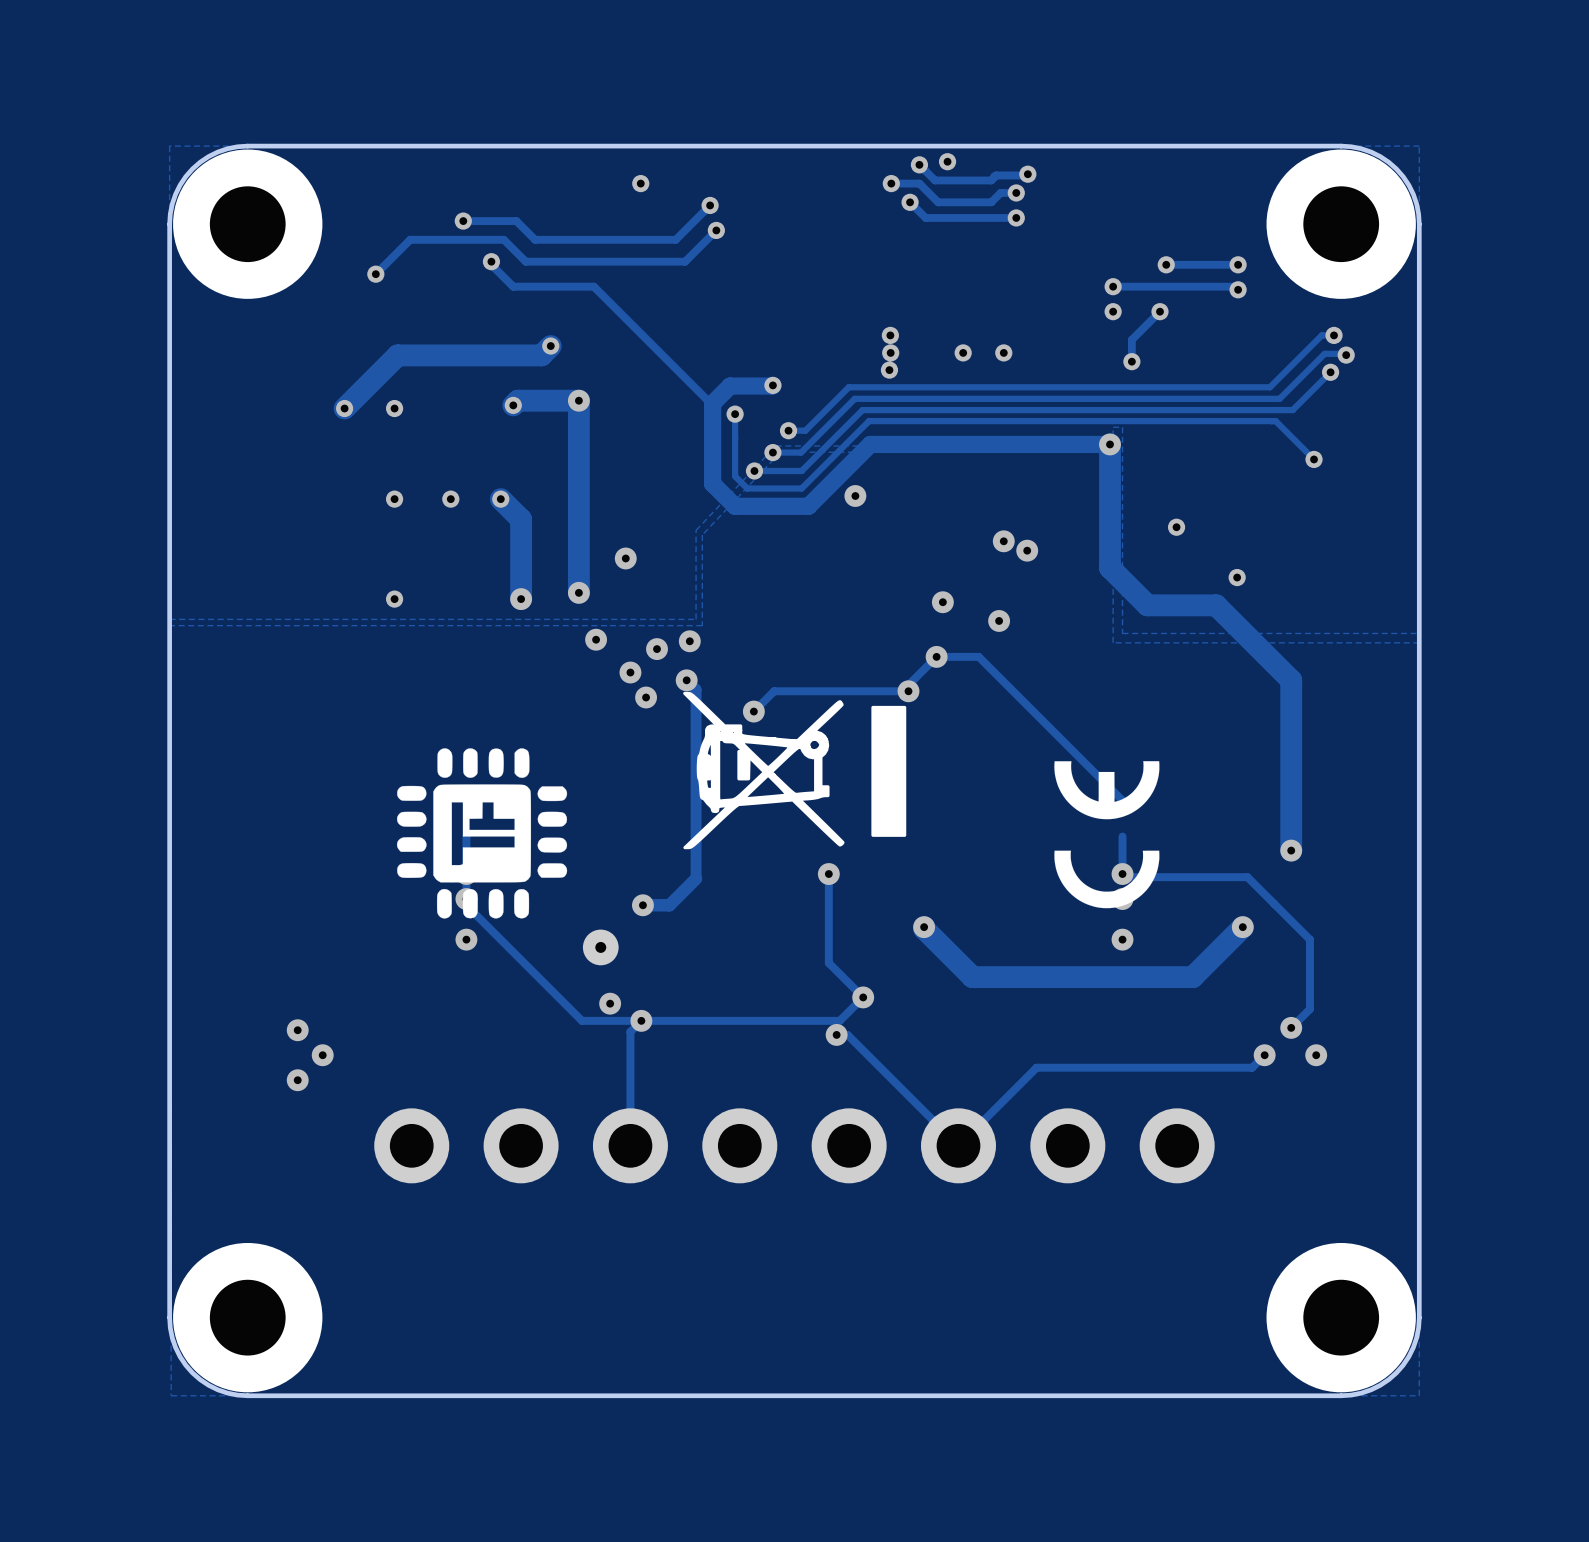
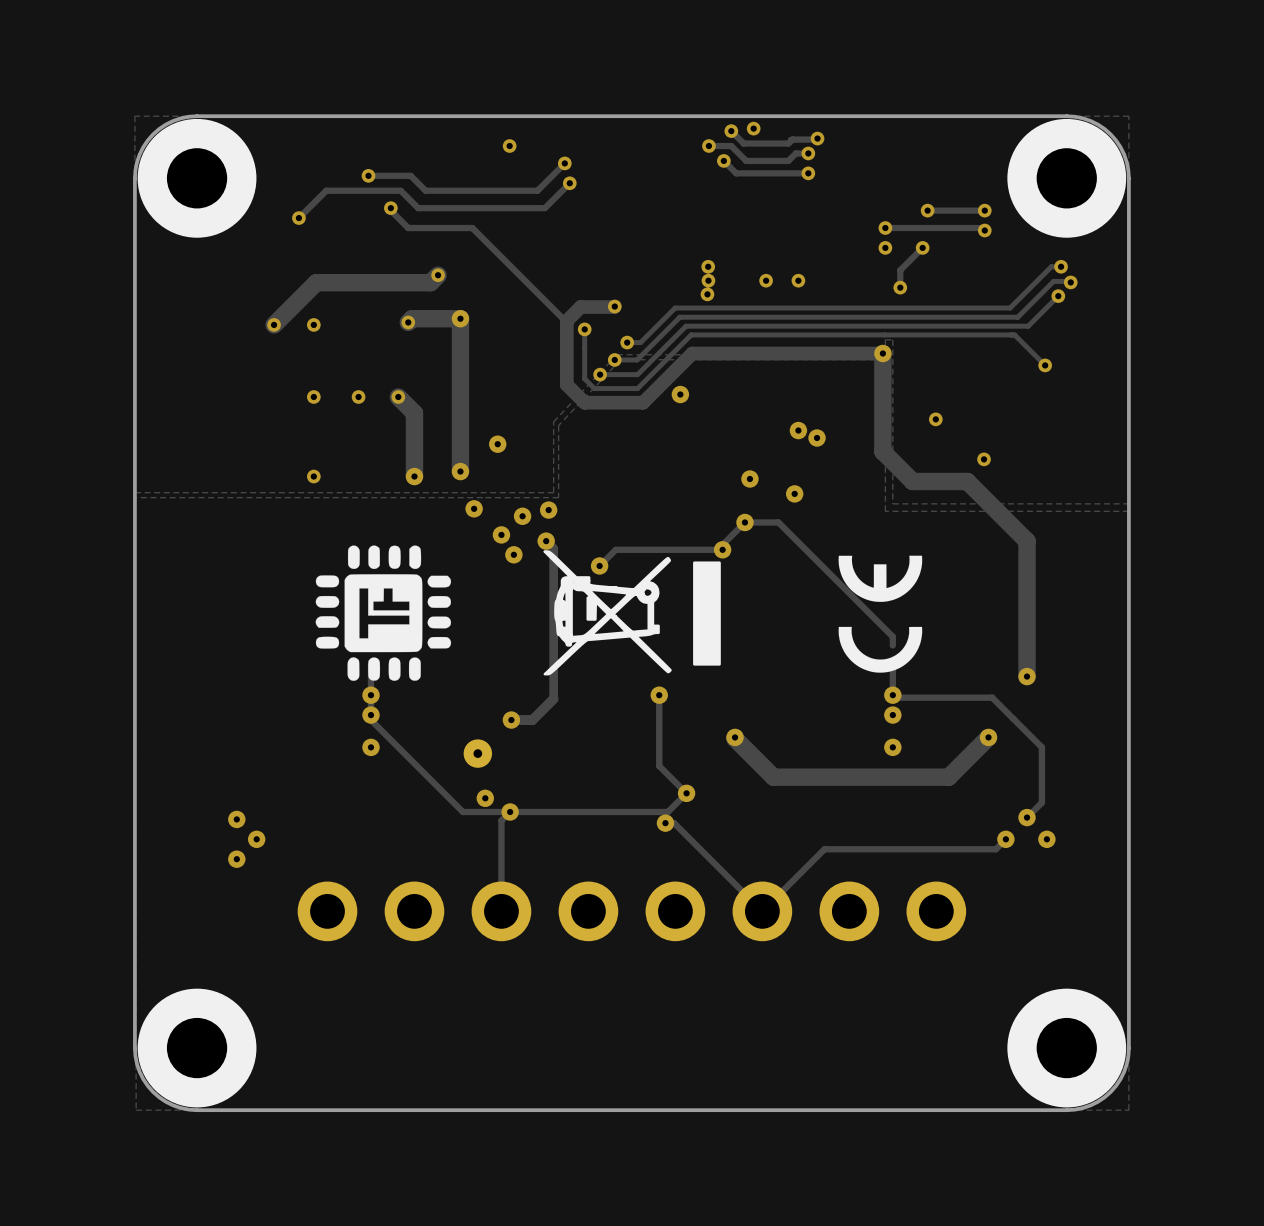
drawing position: (482, 833) -> (383, 613)
drawing position: (1106, 834) -> (880, 614)

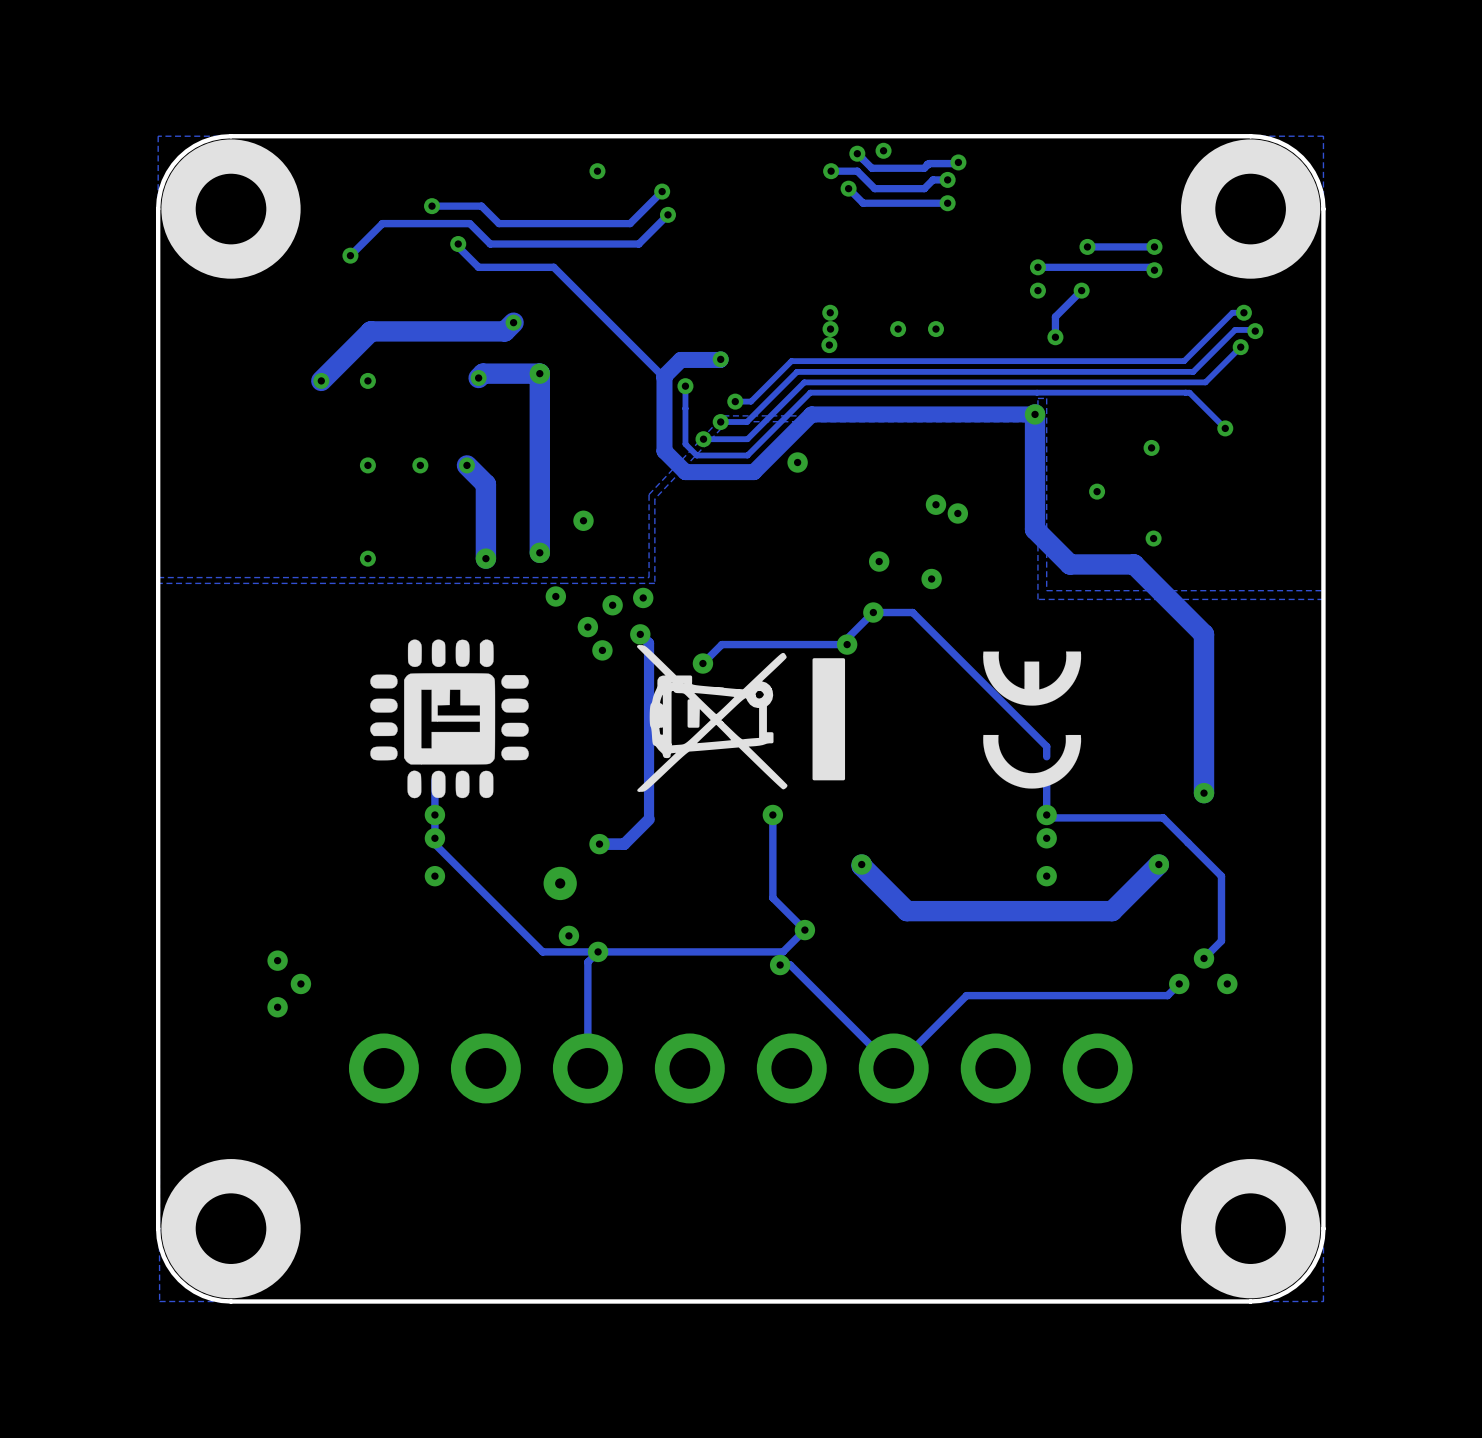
via: none -> (1151, 447)

